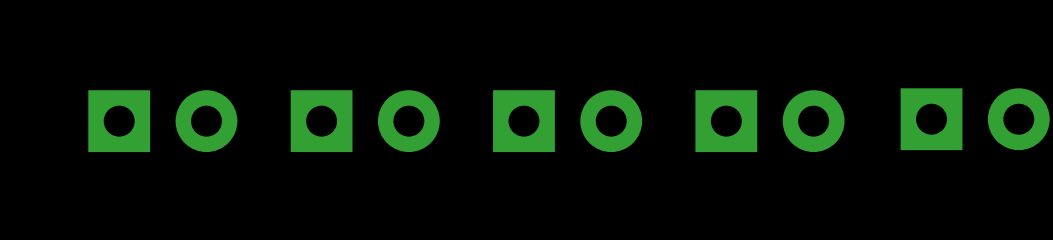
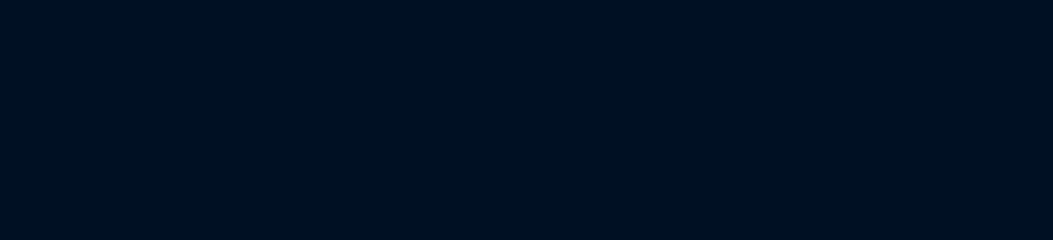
part: (975, 119) -> none
part: (162, 121) -> none
part: (365, 121) -> none
part: (567, 121) -> none
part: (769, 121) -> none

